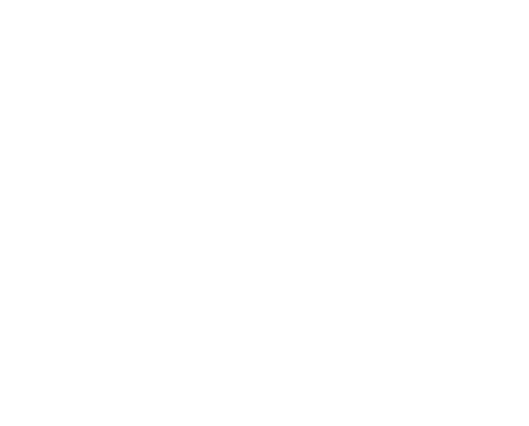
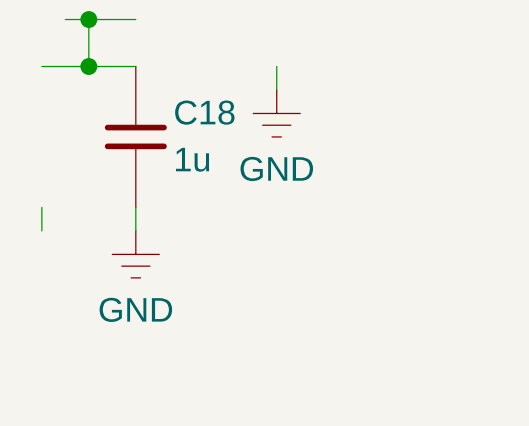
wire: none -> (65, 19) (135, 19)
wire: none -> (88, 19) (88, 66)
junction: none -> (88, 19)
wire: none -> (41, 66) (135, 66)
junction: none -> (88, 66)
wire: none -> (276, 66) (276, 89)
power symbol: none -> GND (276, 113)
C18: none -> 1u (135, 136)
wire: none -> (41, 207) (41, 230)
wire: none -> (135, 207) (135, 230)
power symbol: none -> GND (135, 254)

